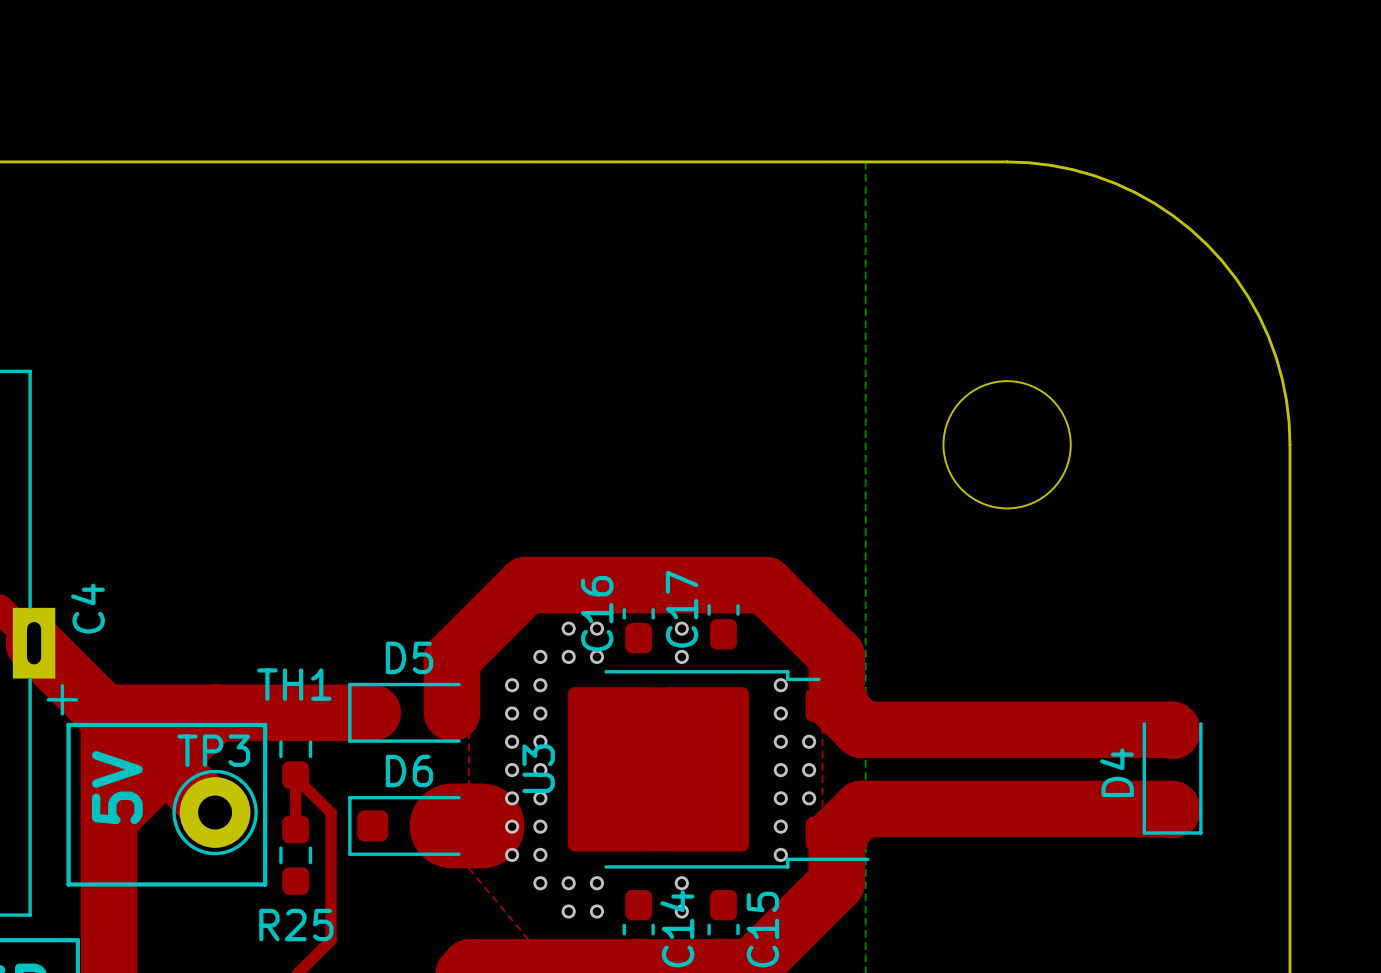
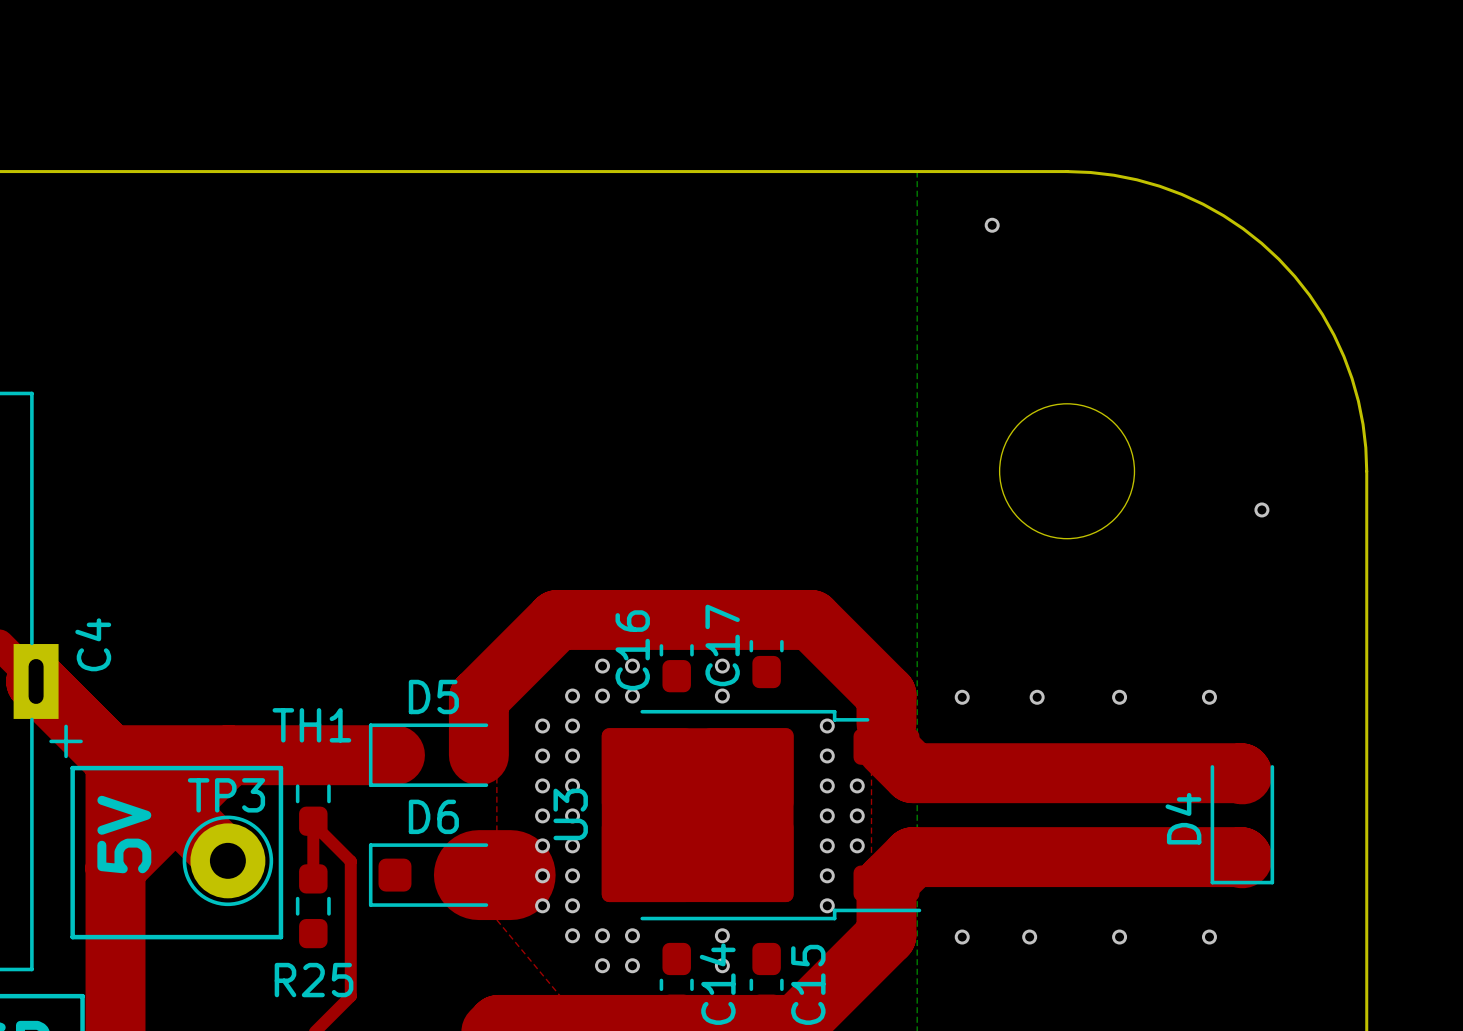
via: none -> (992, 225)
via: none -> (1261, 509)
via: none -> (962, 697)
via: none -> (1037, 697)
via: none -> (1119, 697)
via: none -> (1209, 697)
via: none -> (962, 937)
via: none -> (1029, 937)
via: none -> (1119, 937)
via: none -> (1209, 937)

